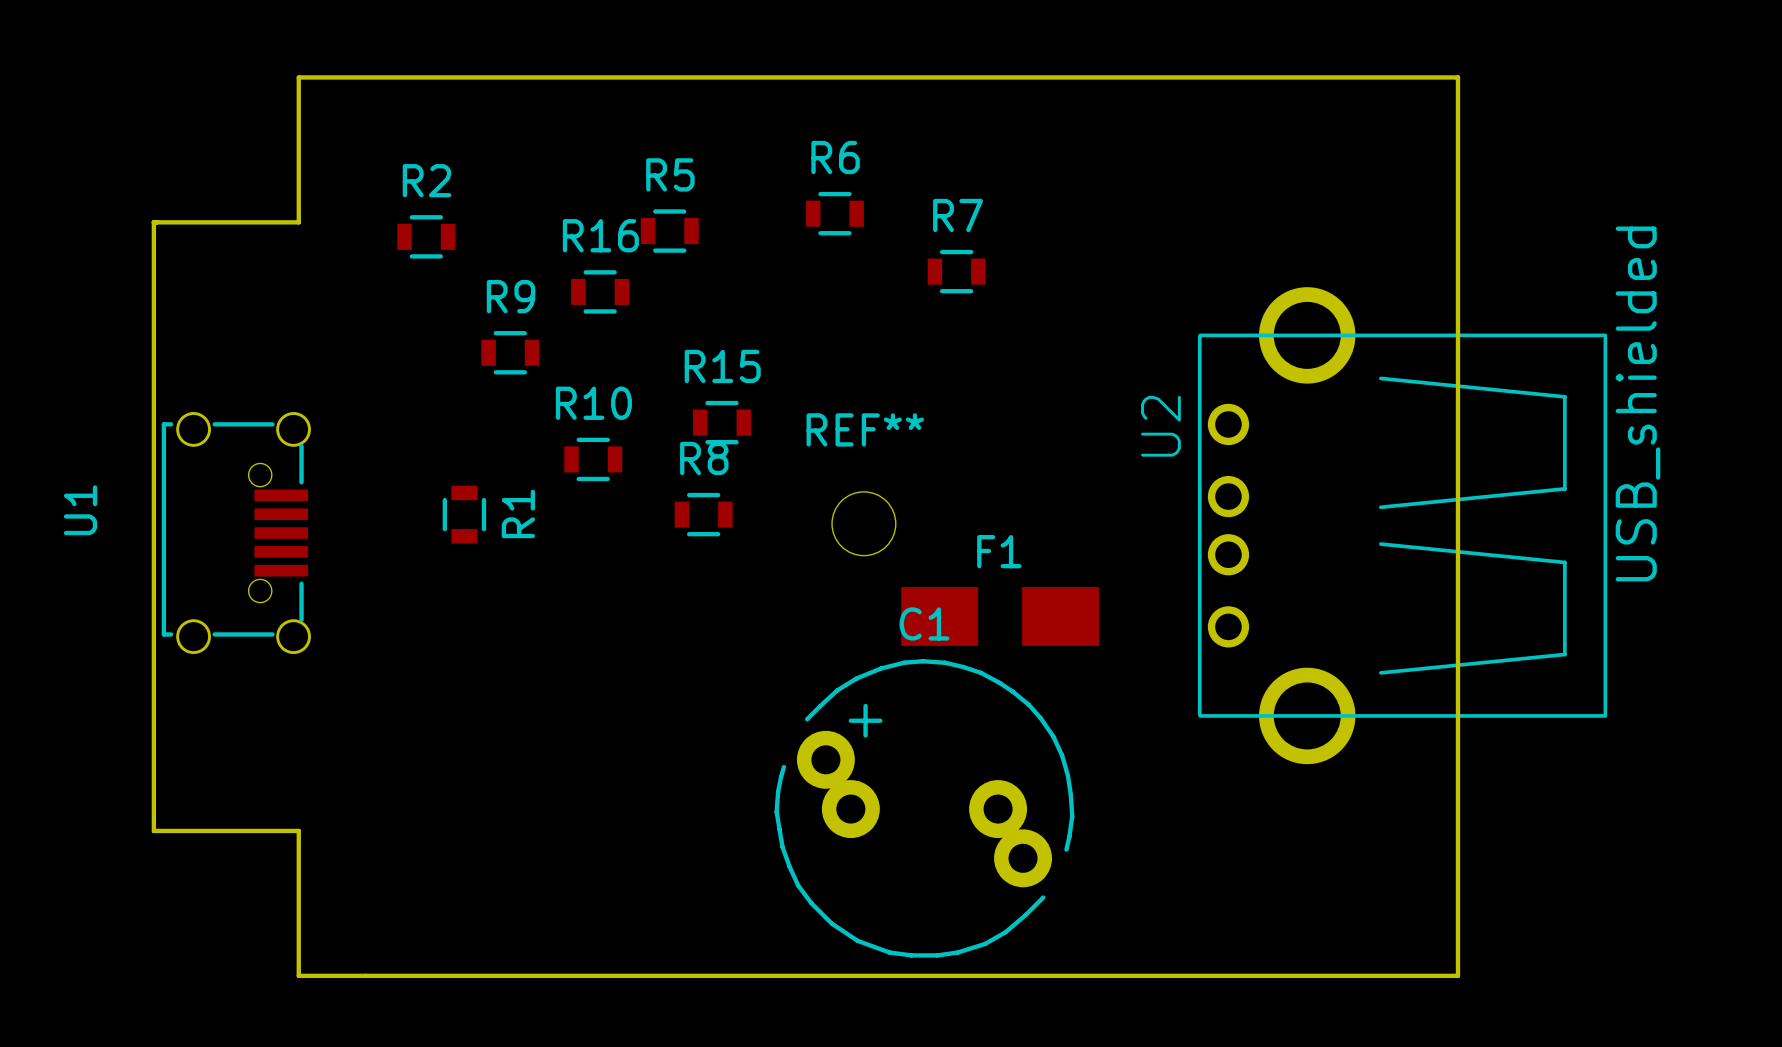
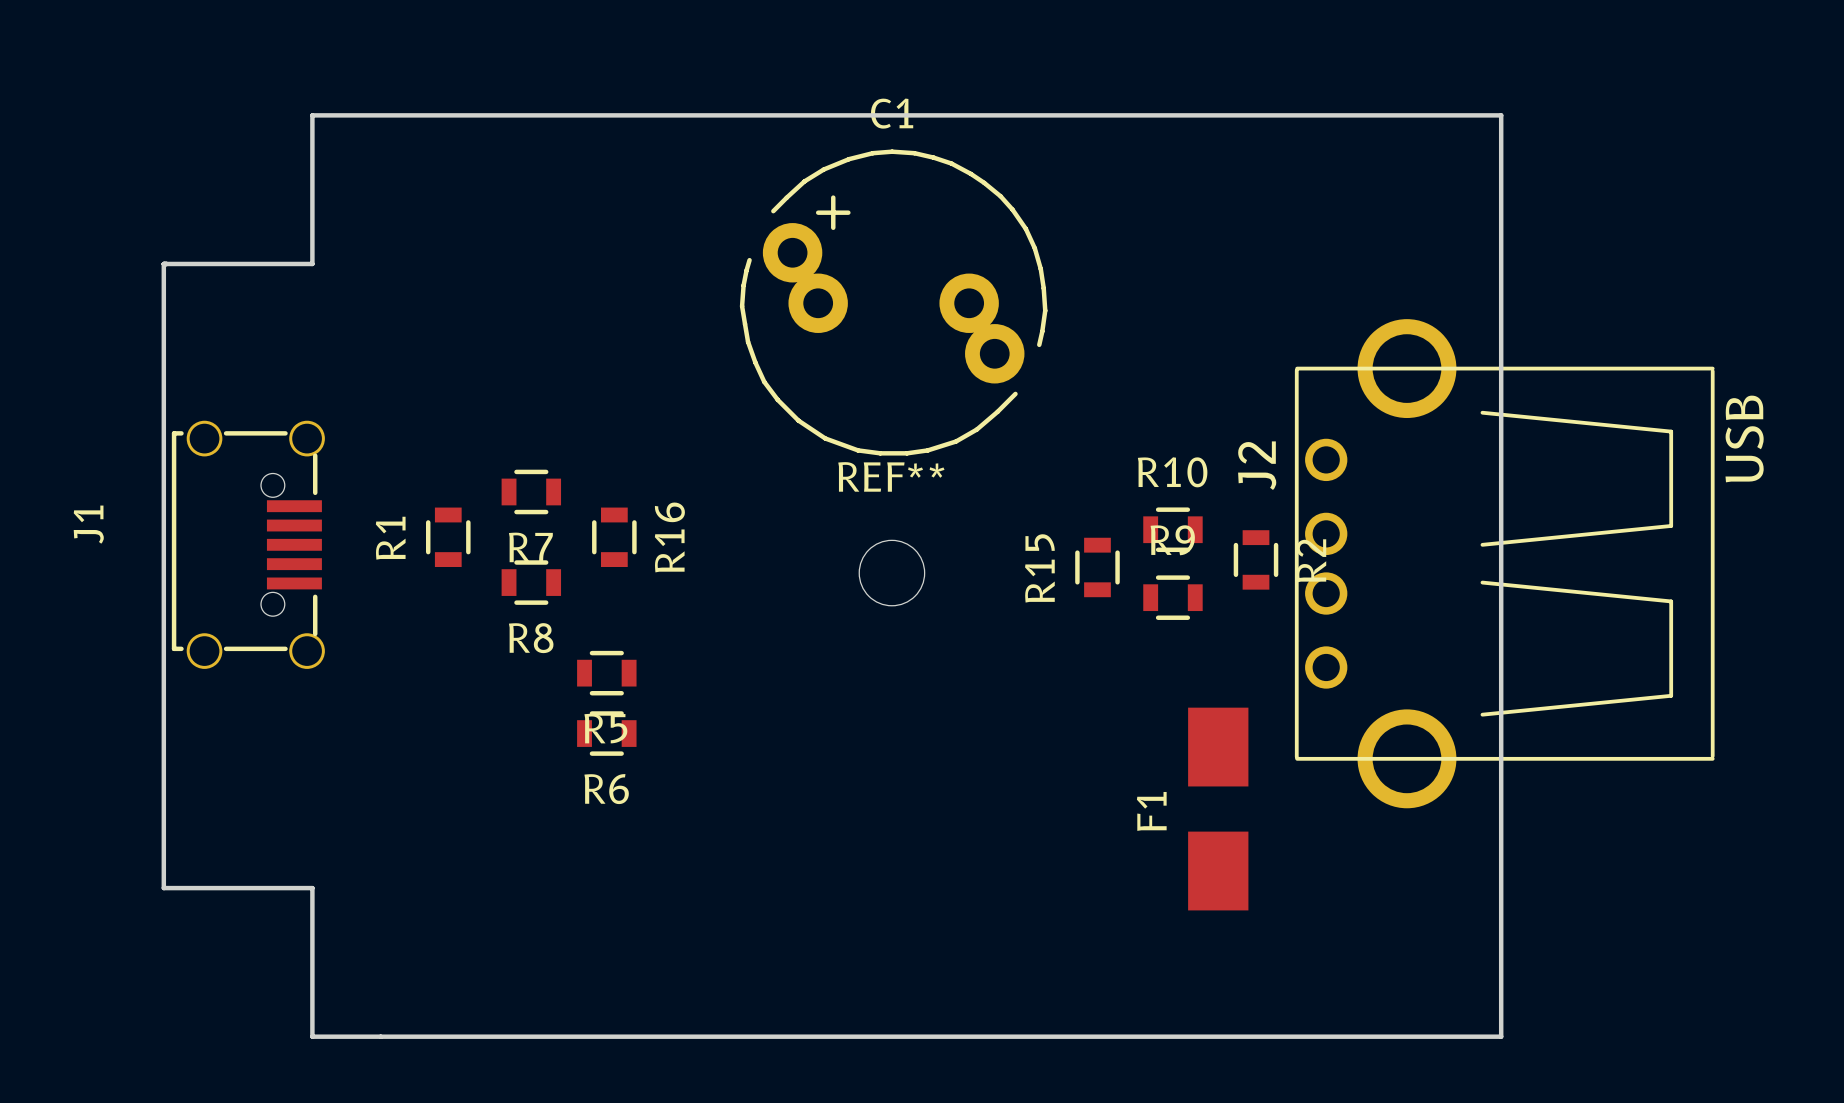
R6 name position: R6 (835, 157) -> R6 (606, 789)
R5 name position: R5 (670, 174) -> R5 (605, 728)
R6 position: (834, 213) -> (606, 733)
R7 name position: R7 (958, 215) -> R7 (530, 547)
R5 position: (669, 231) -> (606, 673)
R2 rotation: 0° (426, 236) -> 90° clockwise (1256, 559)
R2 position: (426, 236) -> (1256, 559)
R7 position: (956, 271) -> (531, 491)
R16 rotation: 0° (600, 291) -> 90° clockwise (614, 537)
R16 position: (600, 291) -> (614, 537)
R9 position: (510, 352) -> (1172, 597)
R15 name position: R15 (722, 366) -> R15 (1039, 568)
R15 rotation: 0° (722, 422) -> 90° clockwise (1097, 567)
R15 position: (722, 422) -> (1097, 567)
R8 name position: R8 (704, 458) -> R8 (531, 638)
R10 position: (593, 459) -> (1172, 529)
J1: none -> (248, 544)
R1 name position: R1 (518, 513) -> R1 (390, 538)
R1 position: (464, 514) -> (448, 537)
R8 position: (703, 514) -> (531, 582)
J2: none -> USB (1504, 563)
U2: USB_shielded (1402, 525) -> none
U1: (236, 533) -> none
F1 name position: F1 (999, 551) -> F1 (1151, 811)
F1 rotation: 0° (1000, 616) -> 90° clockwise (1218, 809)
F1 position: (1000, 616) -> (1218, 809)
C1 position: (924, 808) -> (893, 302)

